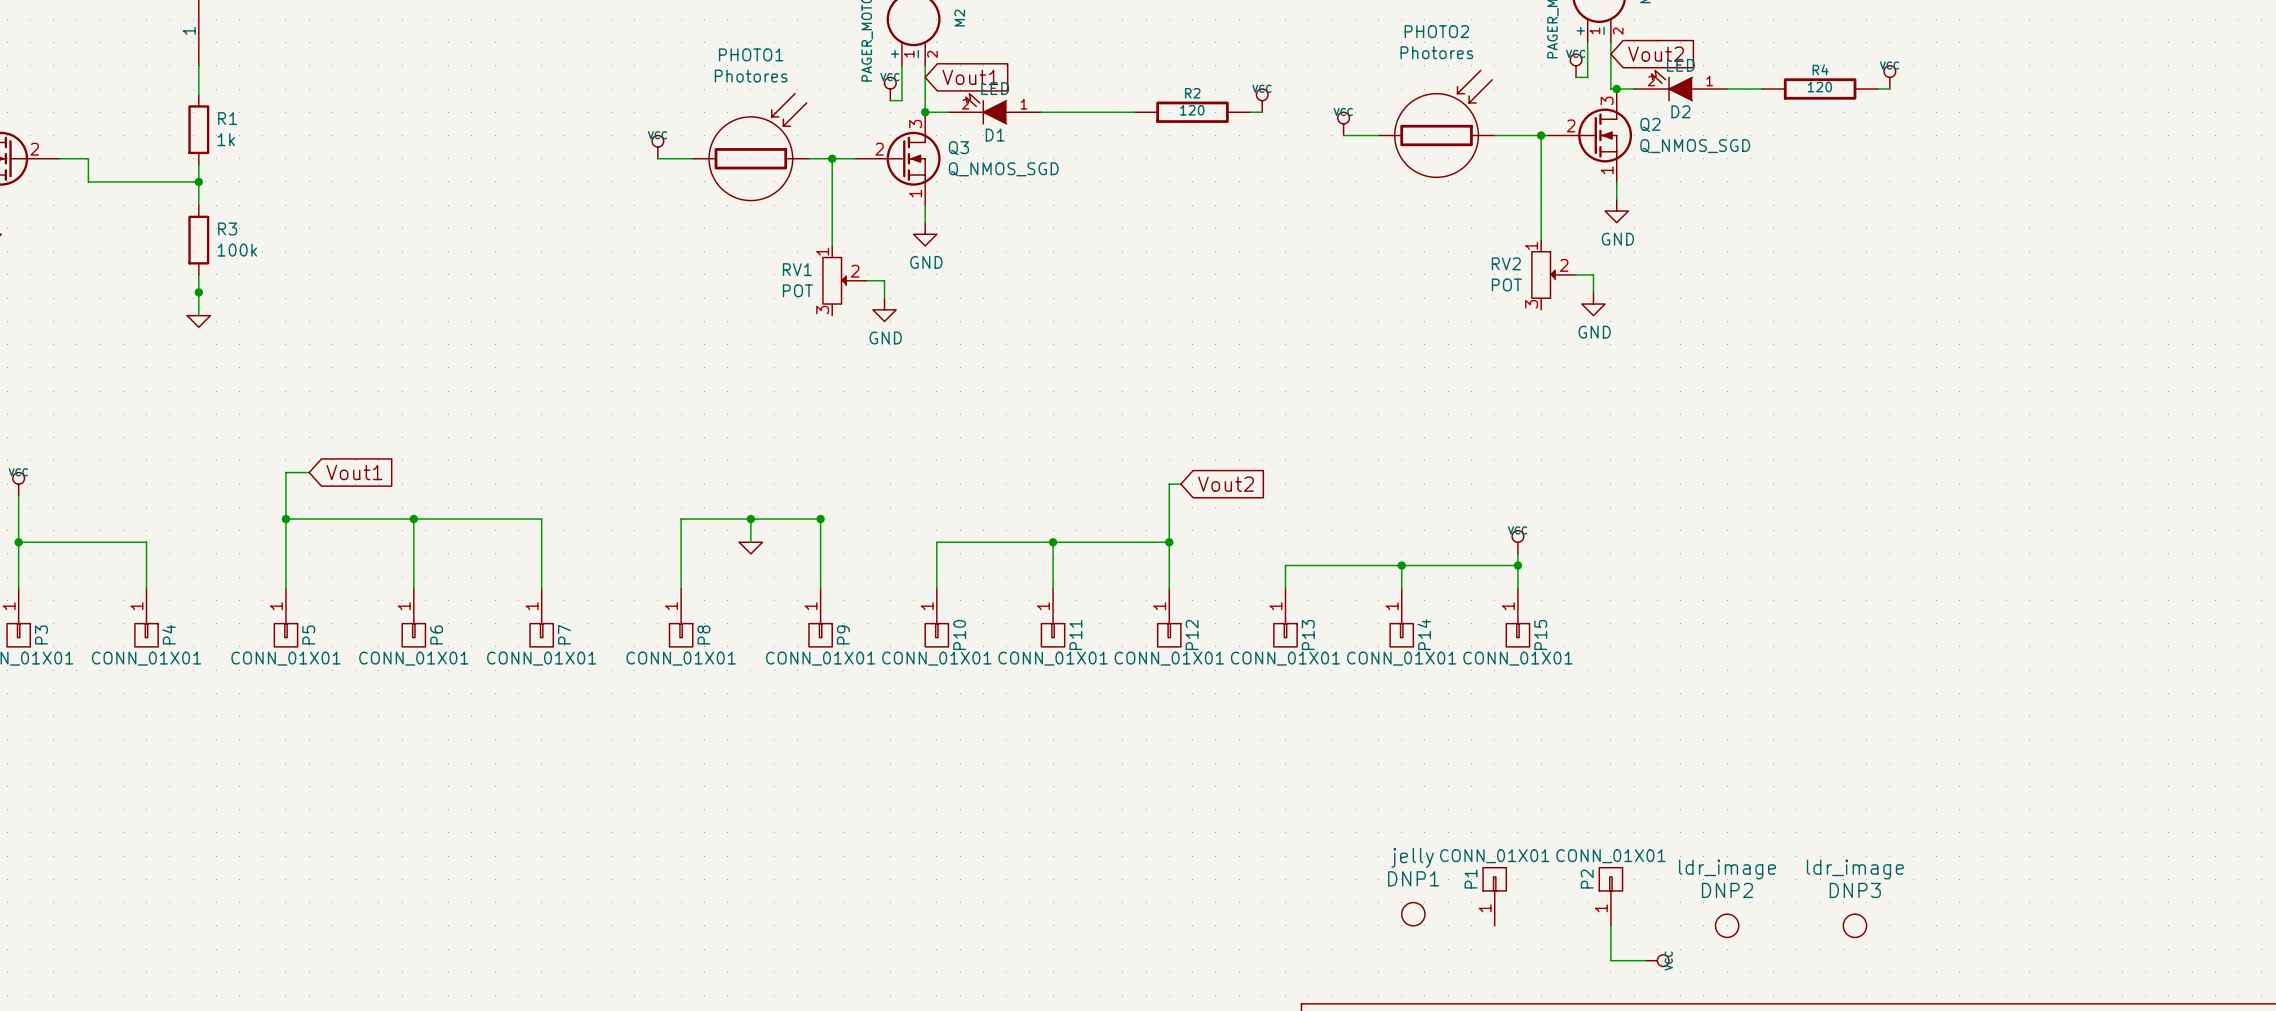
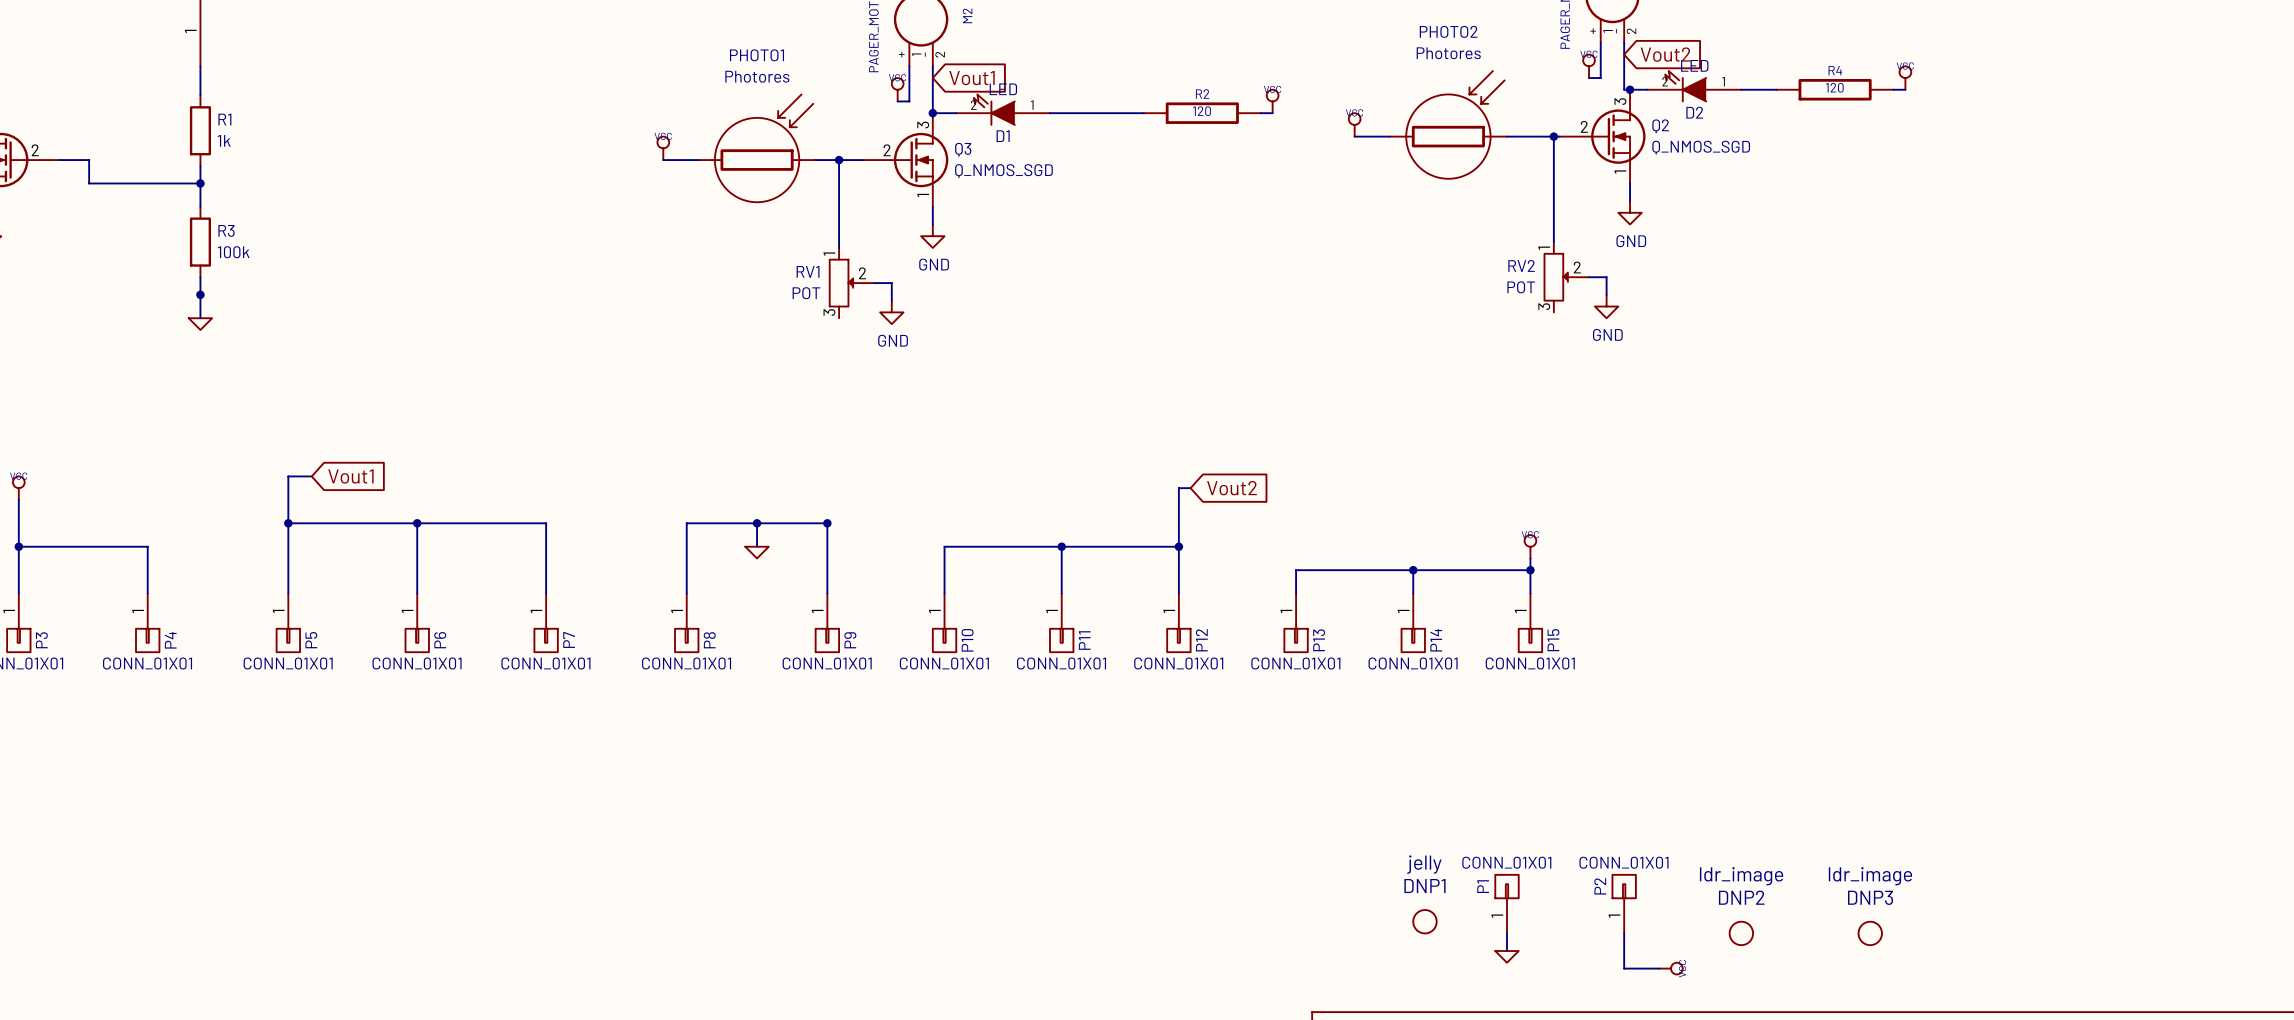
wire: none -> (1506, 933) (1506, 951)
power symbol: none -> (1506, 956)

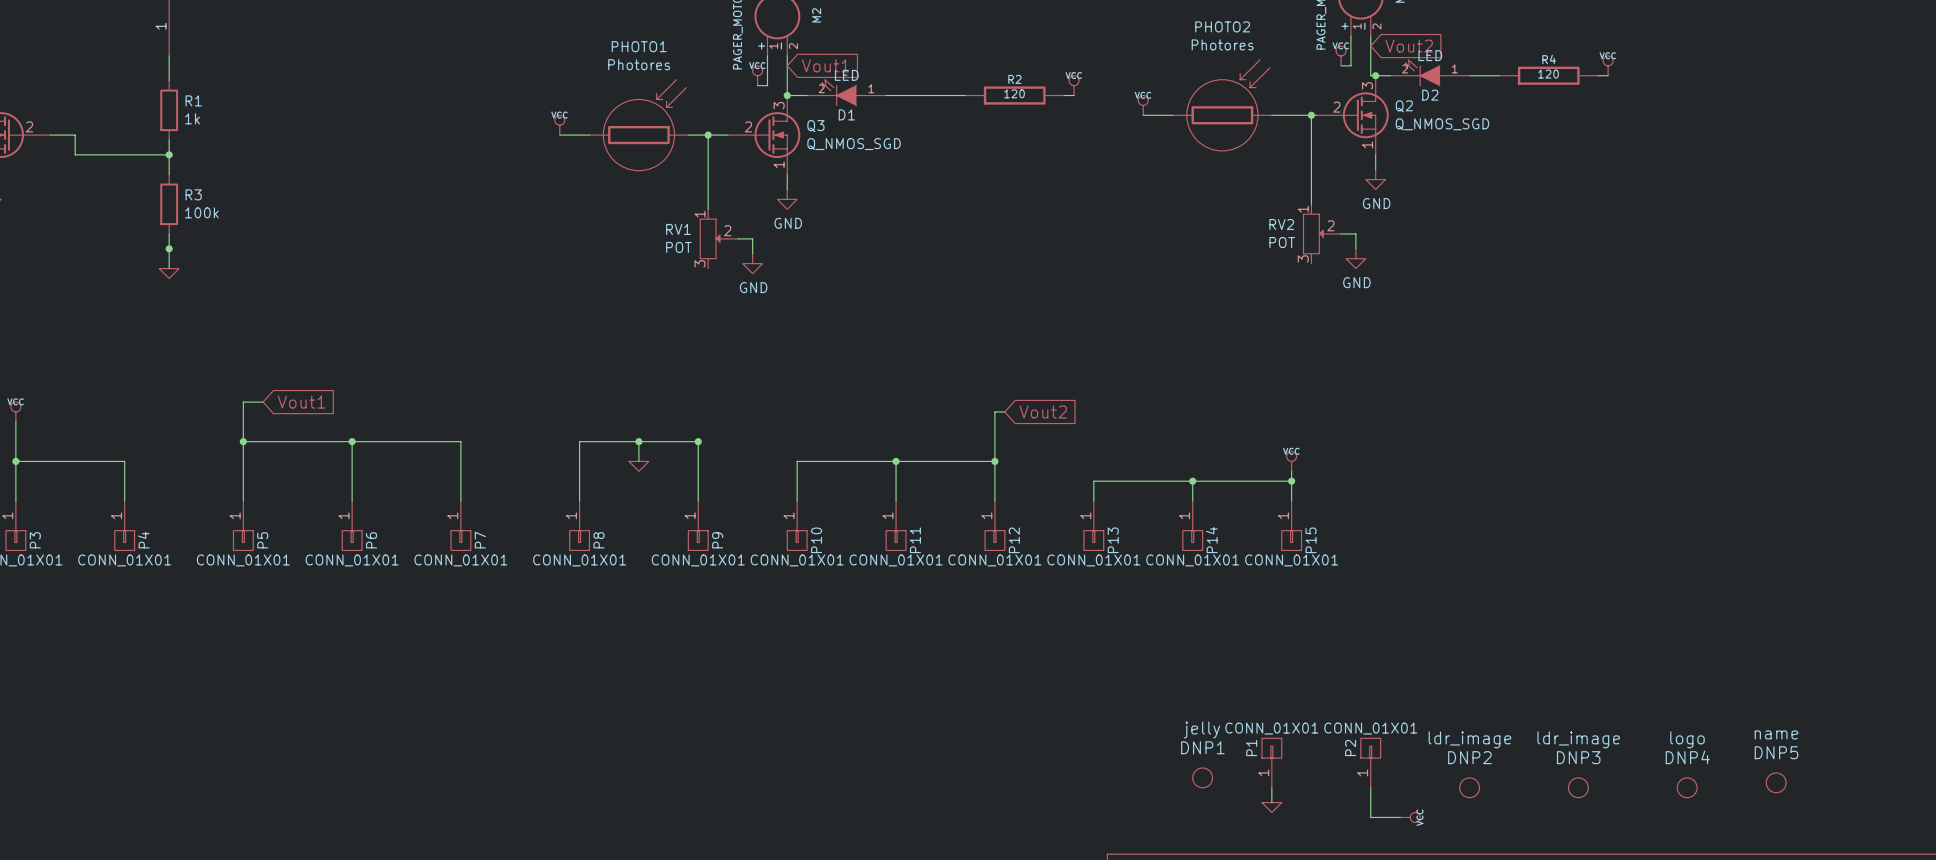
DNP5: none -> name (1776, 782)
DNP4: none -> logo (1687, 787)

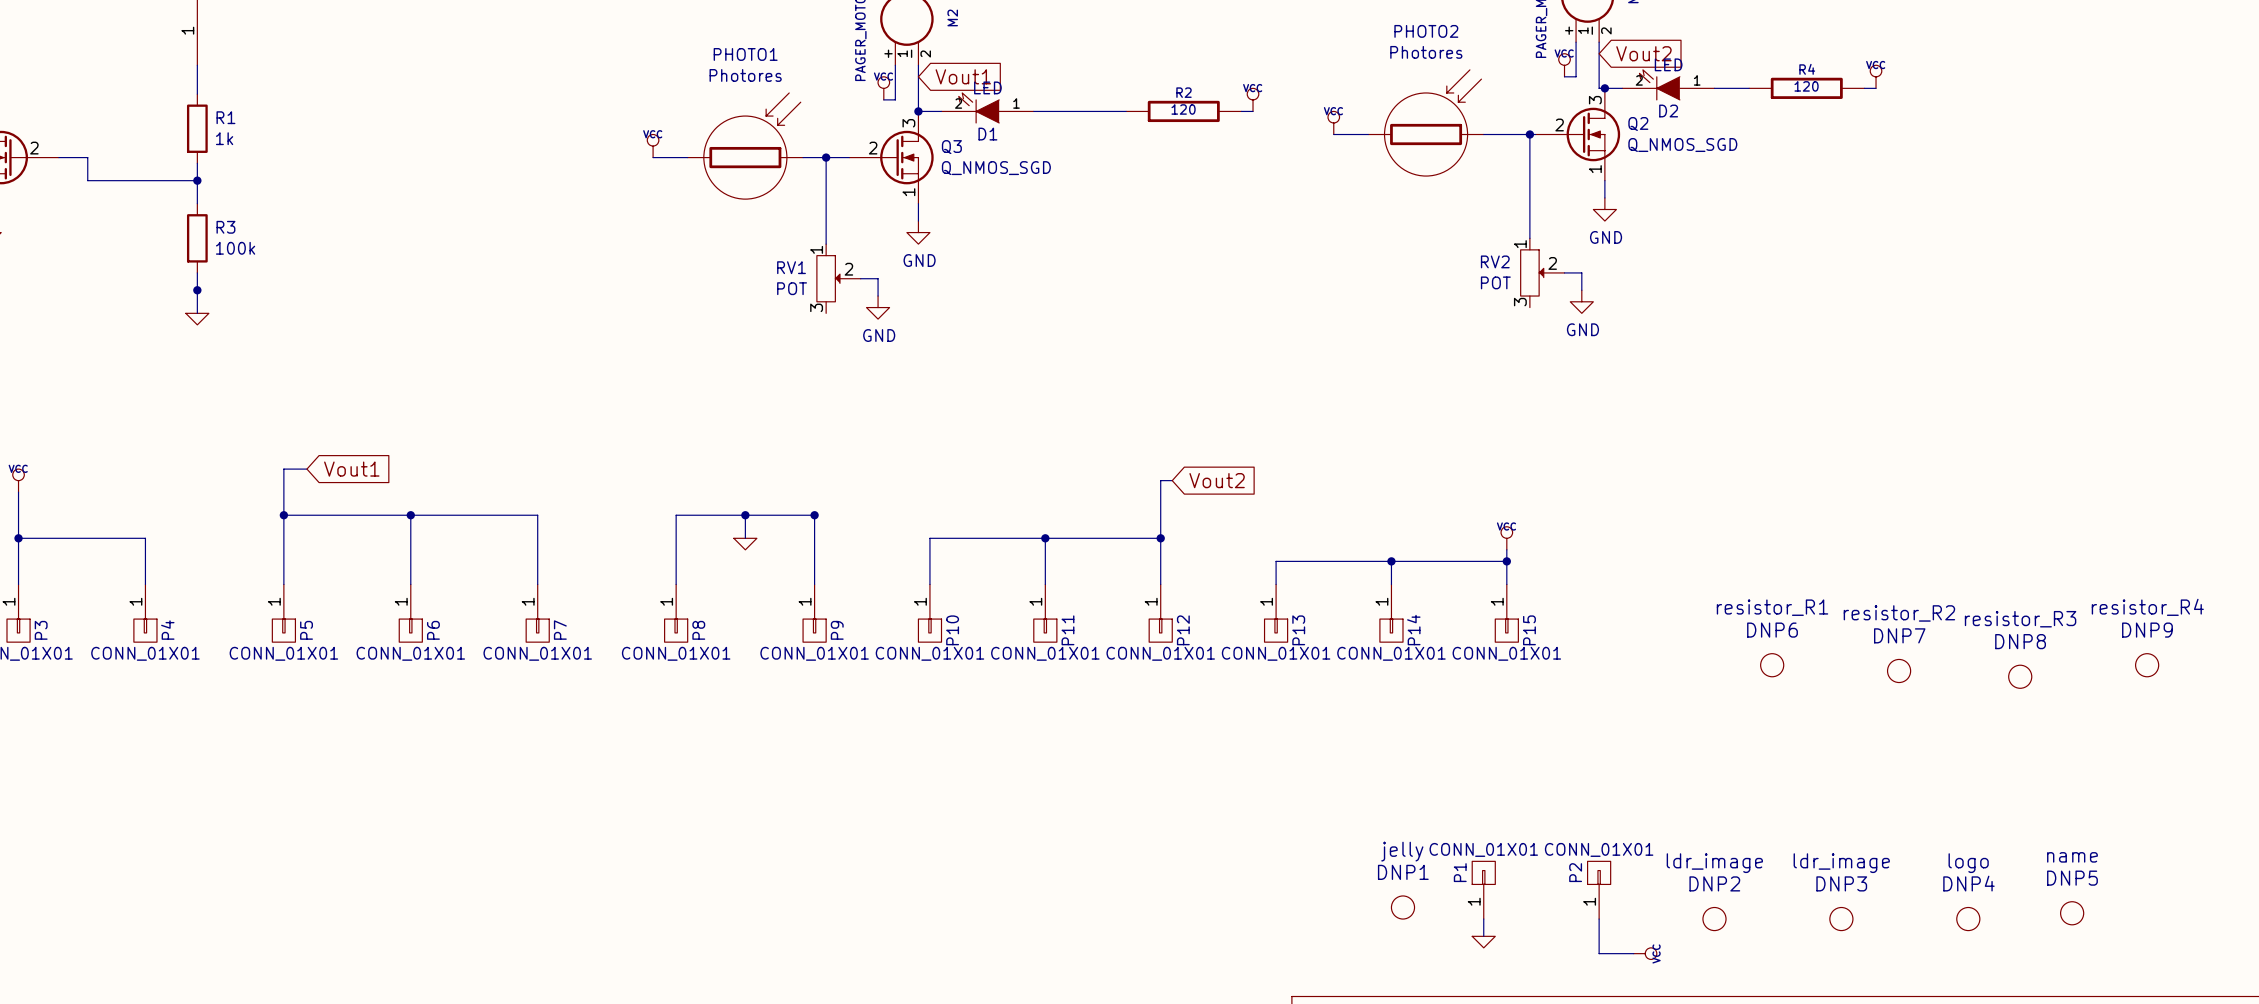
DNP6: none -> resistor_R1 (1772, 665)
DNP9: none -> resistor_R4 (2147, 665)
DNP7: none -> resistor_R2 (1899, 670)
DNP8: none -> resistor_R3 (2020, 676)

